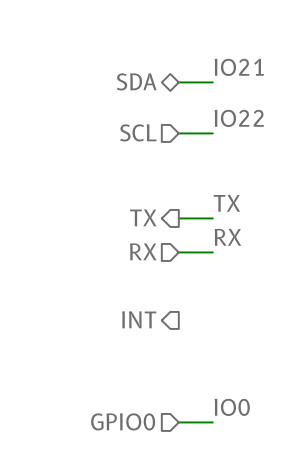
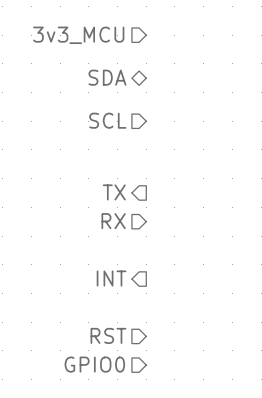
hierarchical label: none -> 3v3_MCU (78, 35)
label: IO21 (239, 67) -> none
wire: (178, 82) (212, 82) -> none
label: IO22 (239, 118) -> none
wire: (178, 133) (212, 133) -> none
label: TX (226, 203) -> none
wire: (178, 218) (212, 218) -> none
label: RX (227, 237) -> none
wire: (178, 252) (212, 252) -> none
hierarchical label: none -> RST (108, 335)
label: IO0 (232, 407) -> none
wire: (178, 422) (212, 422) -> none

